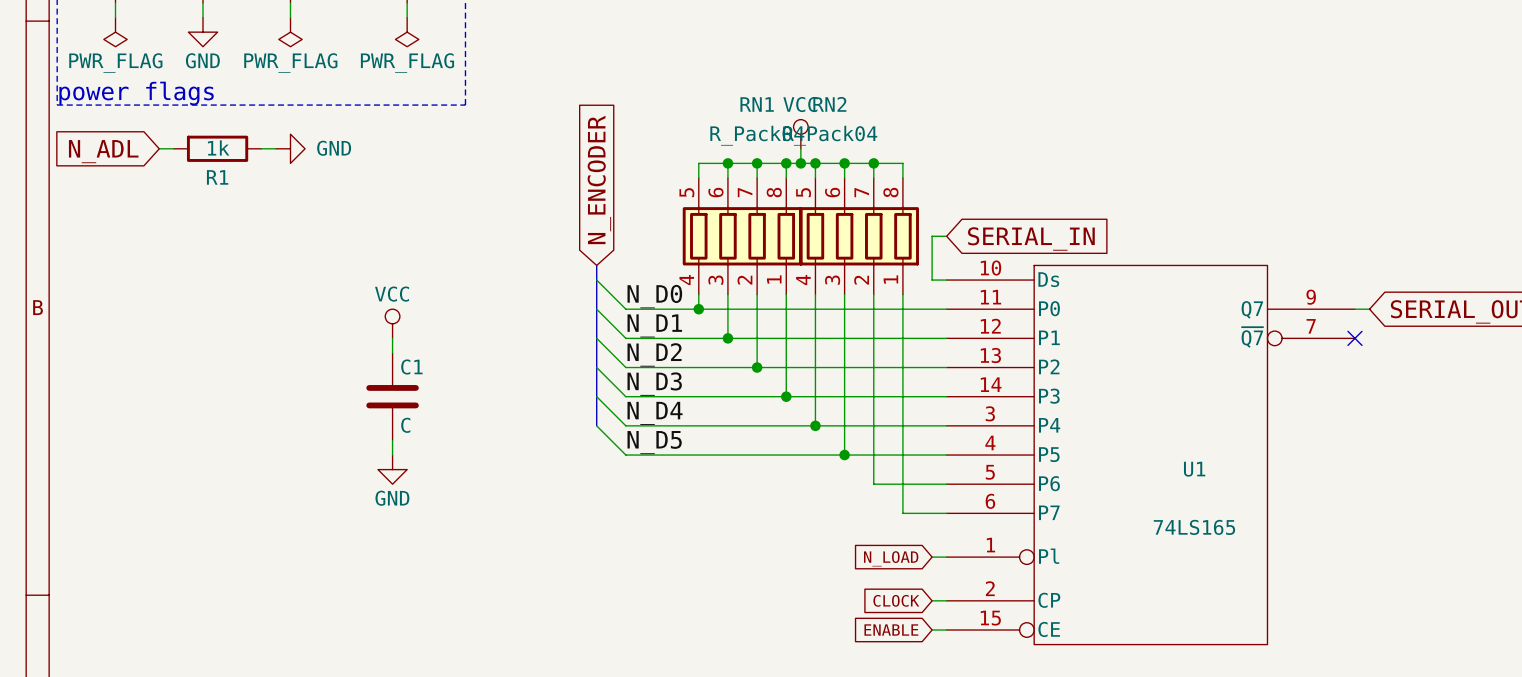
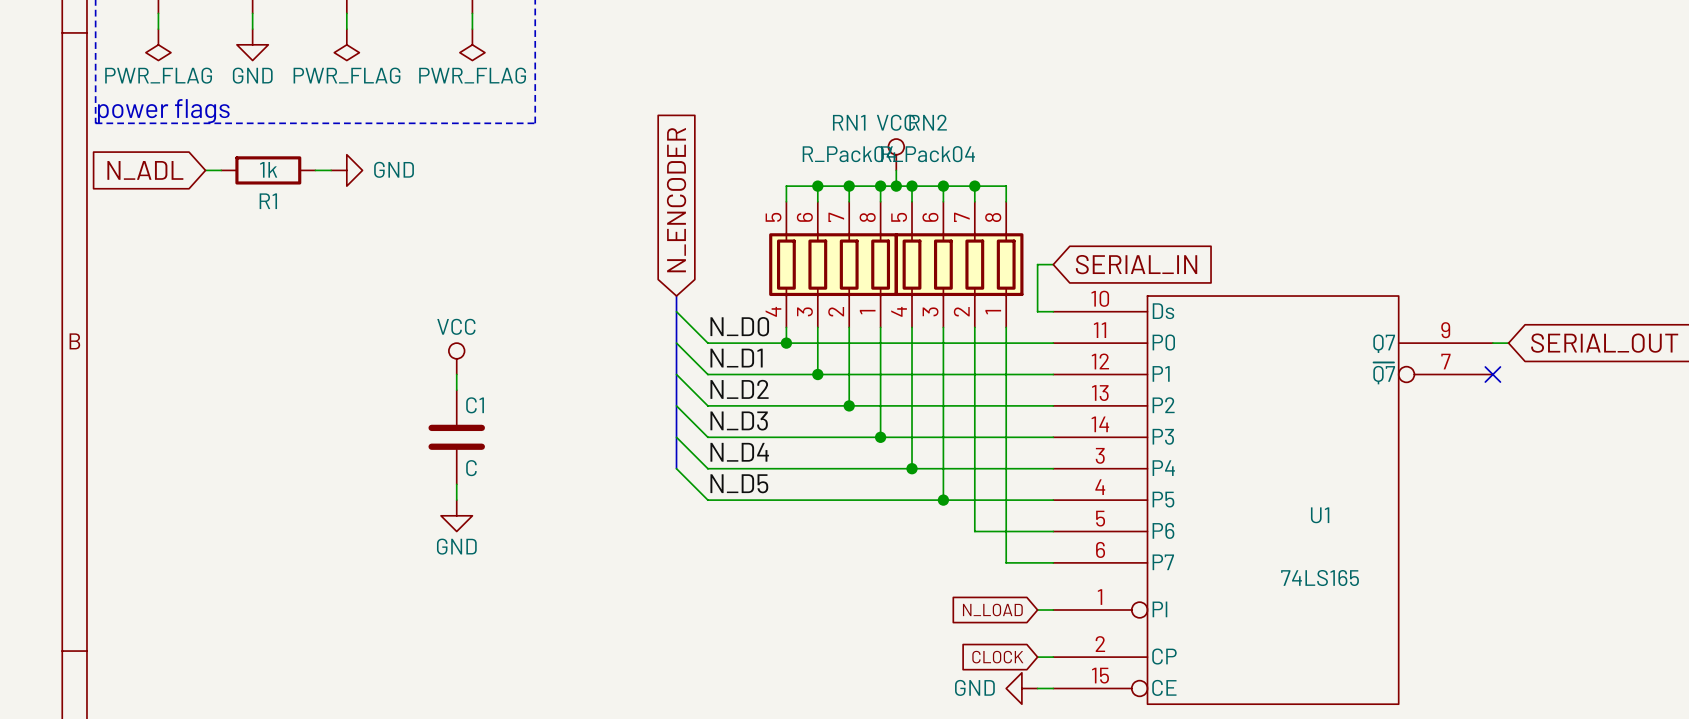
global label: ENABLE (891, 630) -> none
power symbol: none -> GND (1021, 688)

